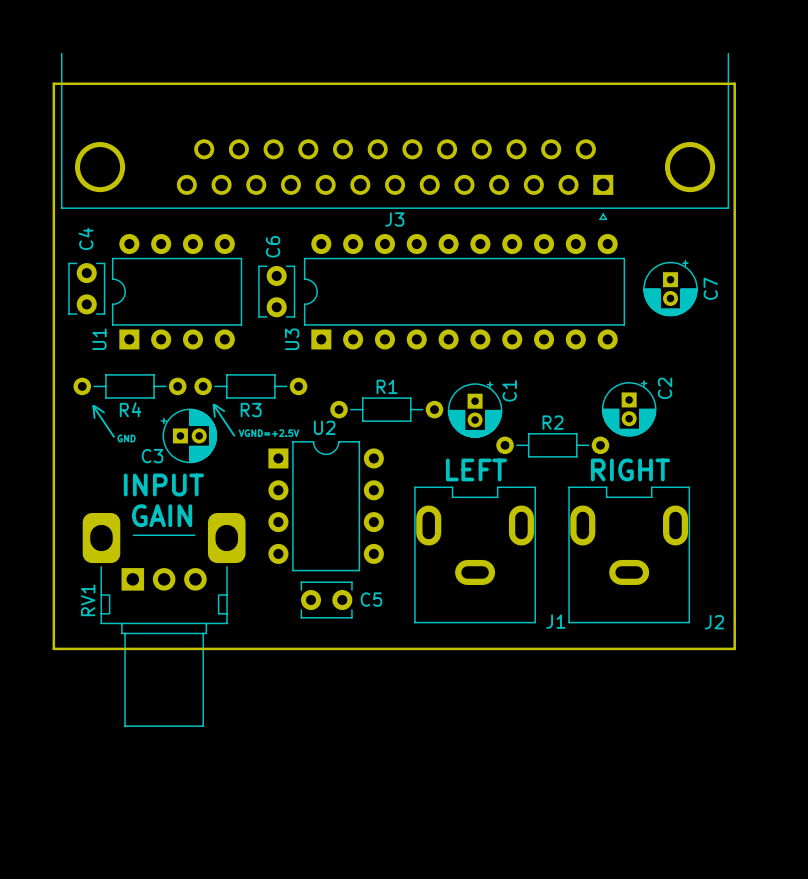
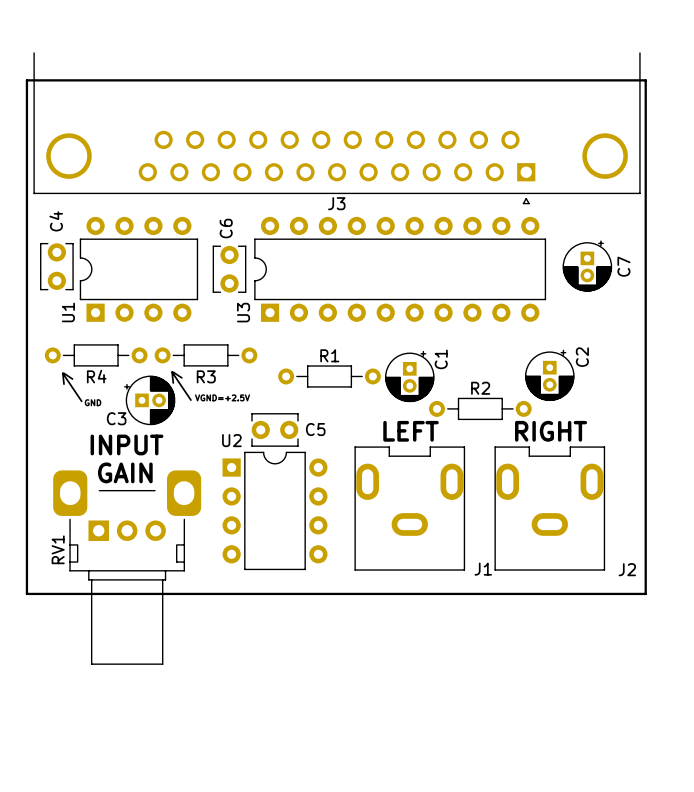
U2 name position: U2 (324, 427) -> U2 (231, 440)
U2 position: (326, 506) -> (274, 510)
C5 position: (326, 600) -> (274, 429)

